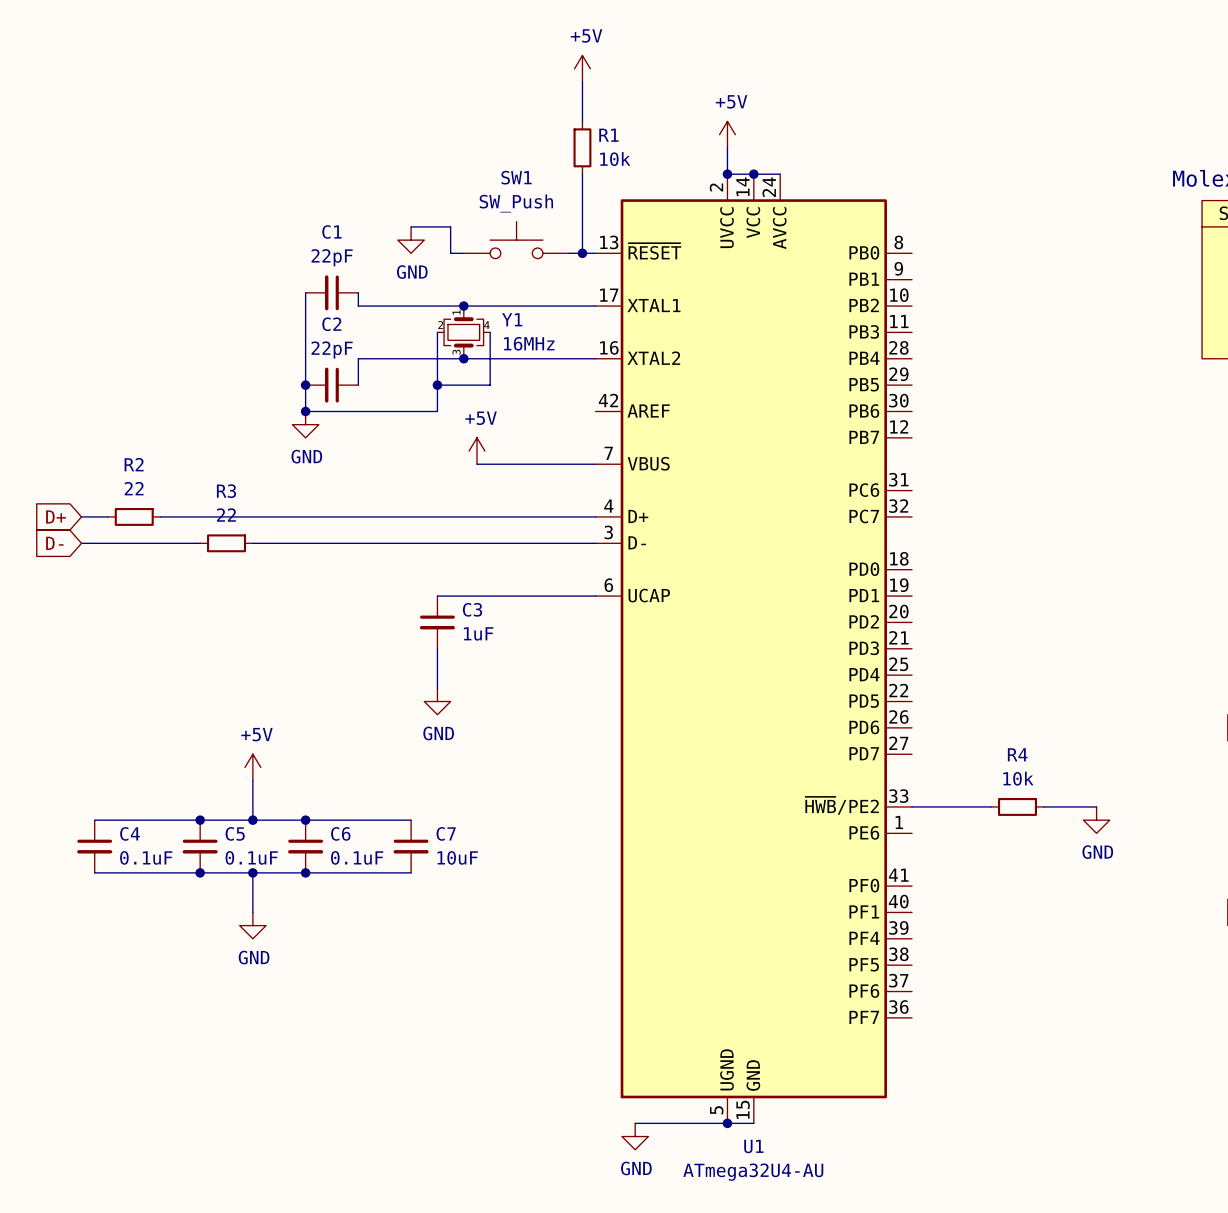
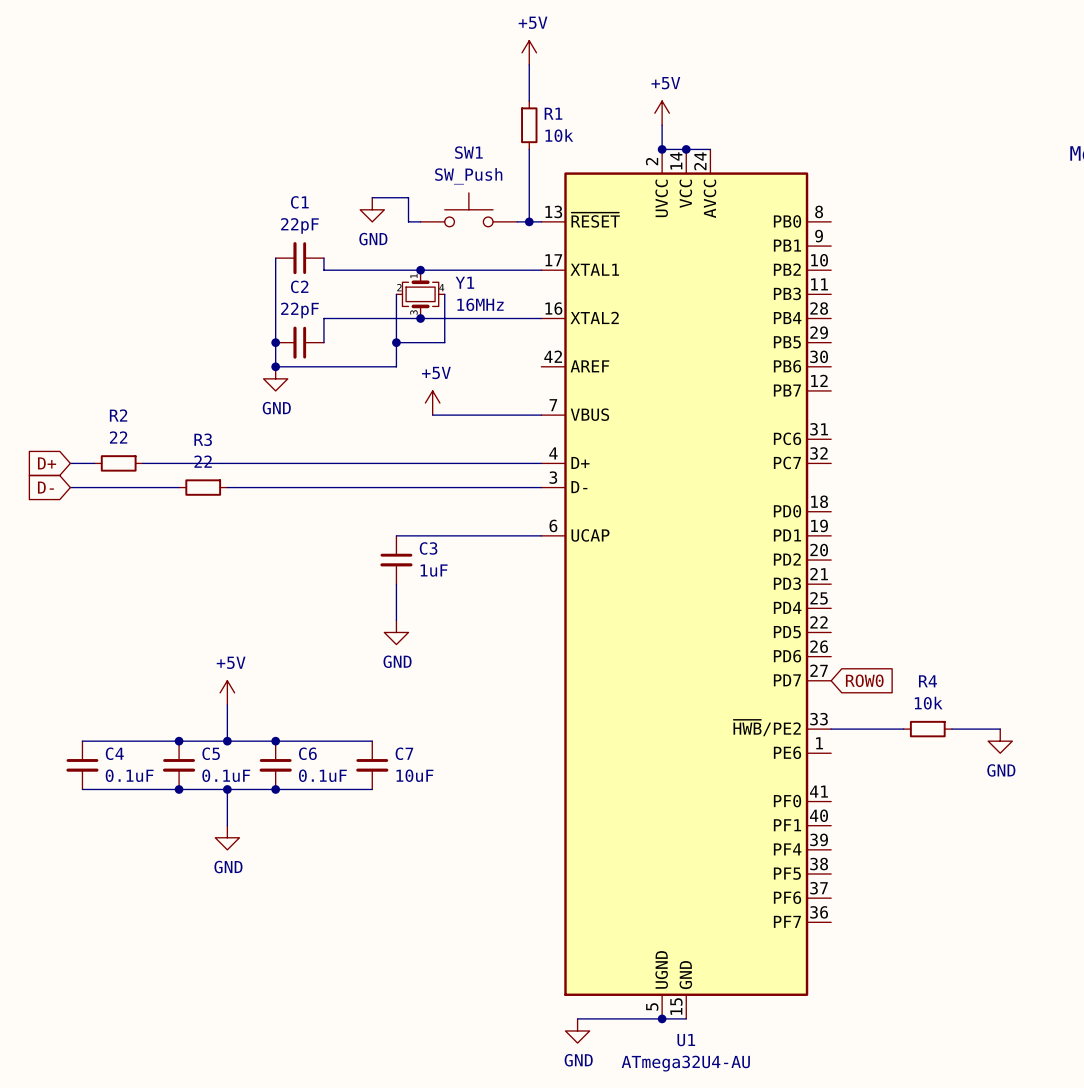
global label: none -> ROW0 (864, 680)

